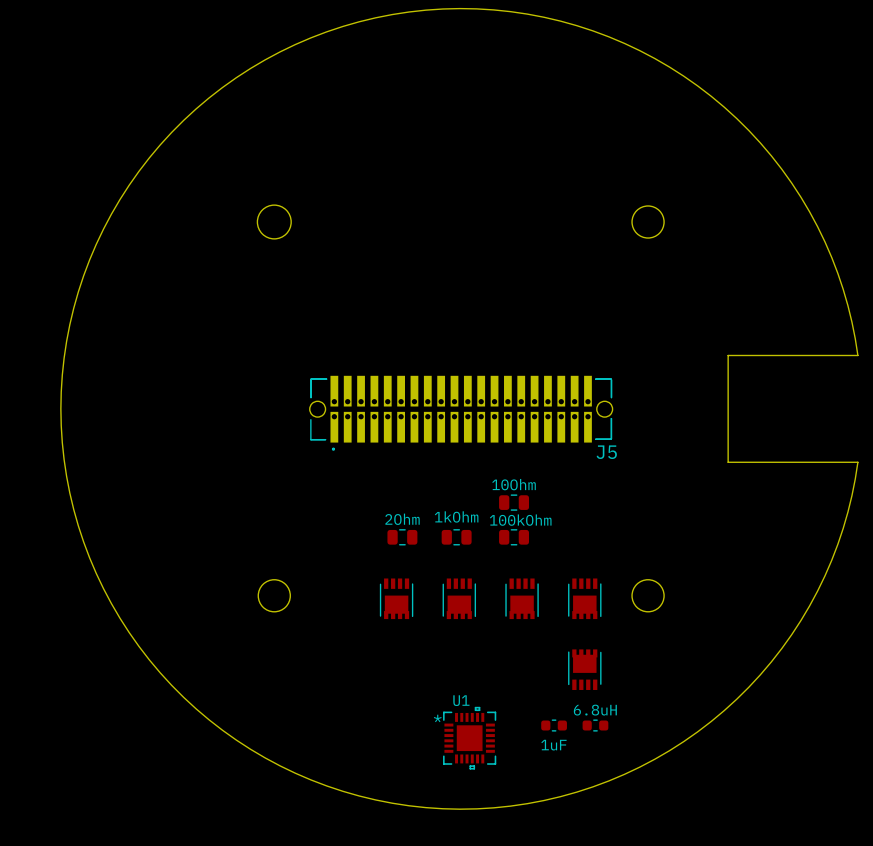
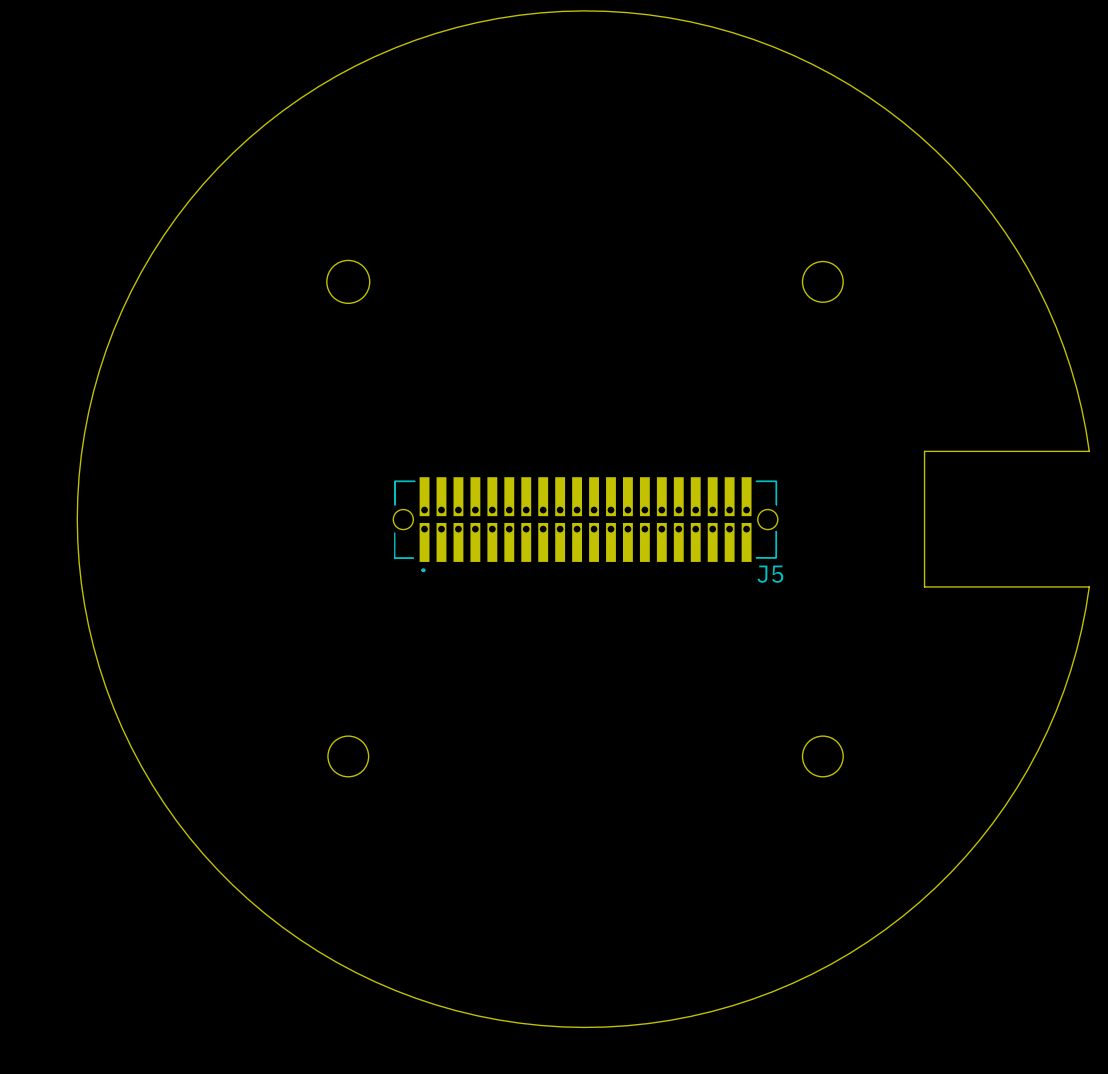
part: 10Ohm (514, 502) -> none
part: 2Ohm (402, 537) -> none
part: 1kOhm (456, 537) -> none
part: 100kOhm (514, 537) -> none
part: (396, 598) -> none
part: (459, 598) -> none
part: (522, 598) -> none
part: (584, 598) -> none
part: (584, 669) -> none
text: U1 (461, 700) -> none
part: 1uF (554, 725) -> none
part: 6.8uH (595, 725) -> none
part: (469, 738) -> none

